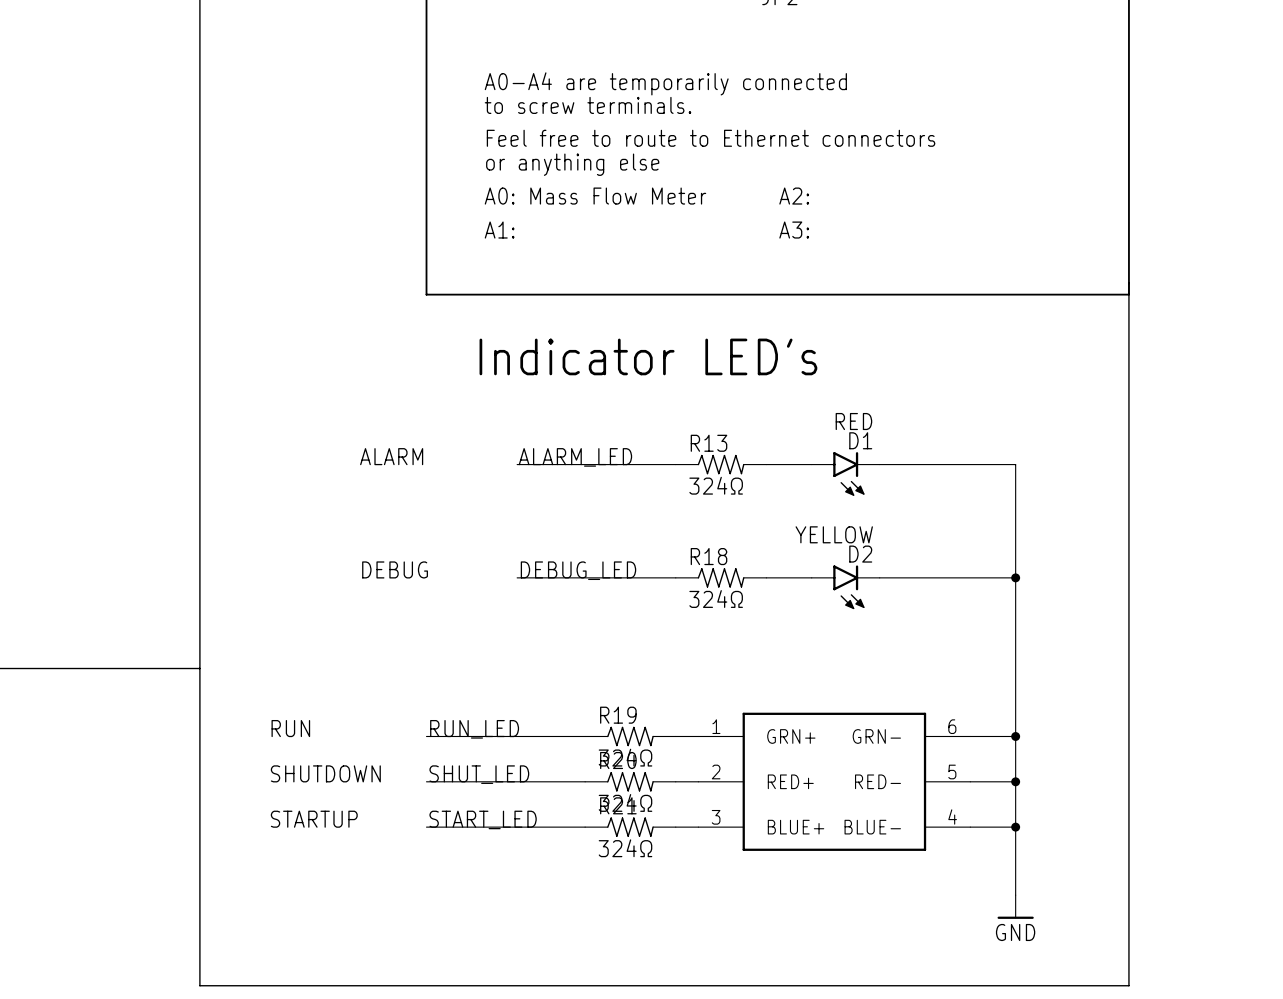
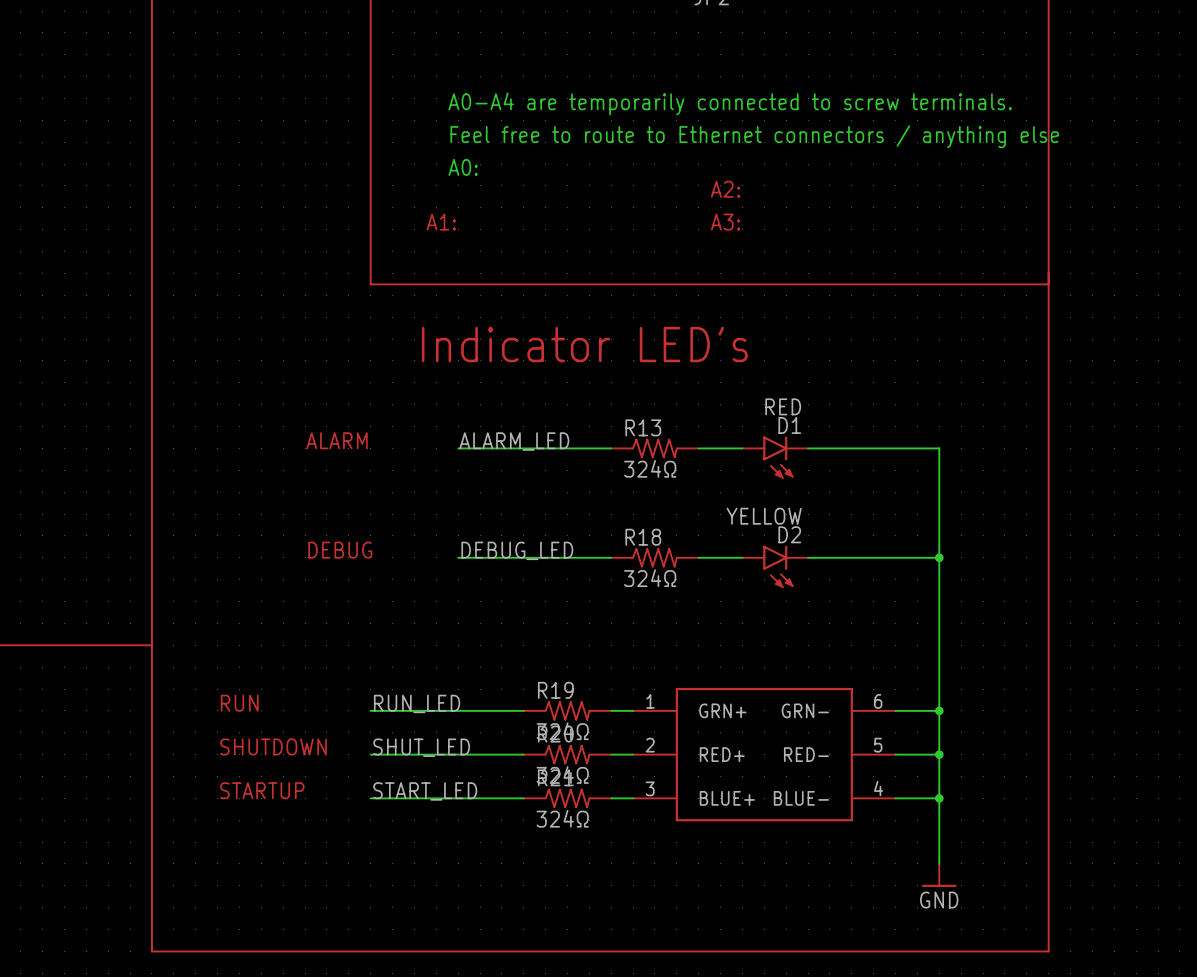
text: A0-A4 are temporarily connected (665, 83) -> A0-A4 are temporarily connected to screw terminals. (730, 103)
text: to screw terminals. (588, 105) -> none
text: Feel free to route to Ethernet connectors (711, 138) -> Feel free to route to Ethernet connectors / anything else (754, 136)
text: or anything else (572, 164) -> none
text: none -> A0: (463, 167)
text: A0: Mass Flow Meter (595, 196) -> none

